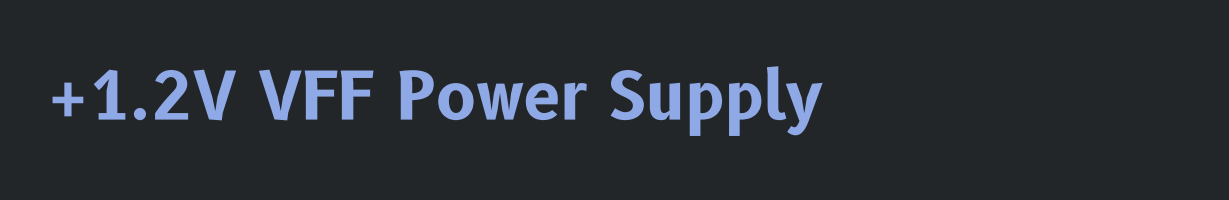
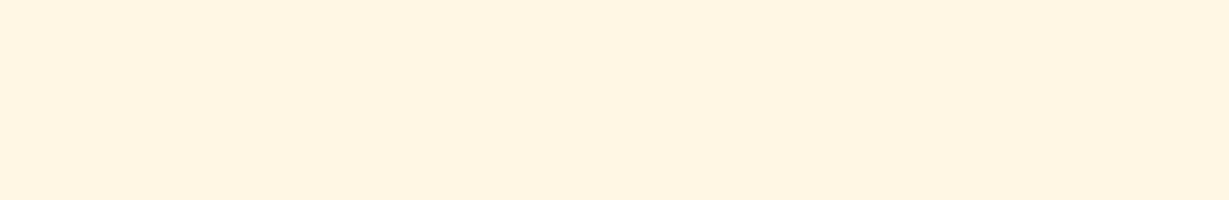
text: +1.2V VFF Power Supply (437, 101) -> none

